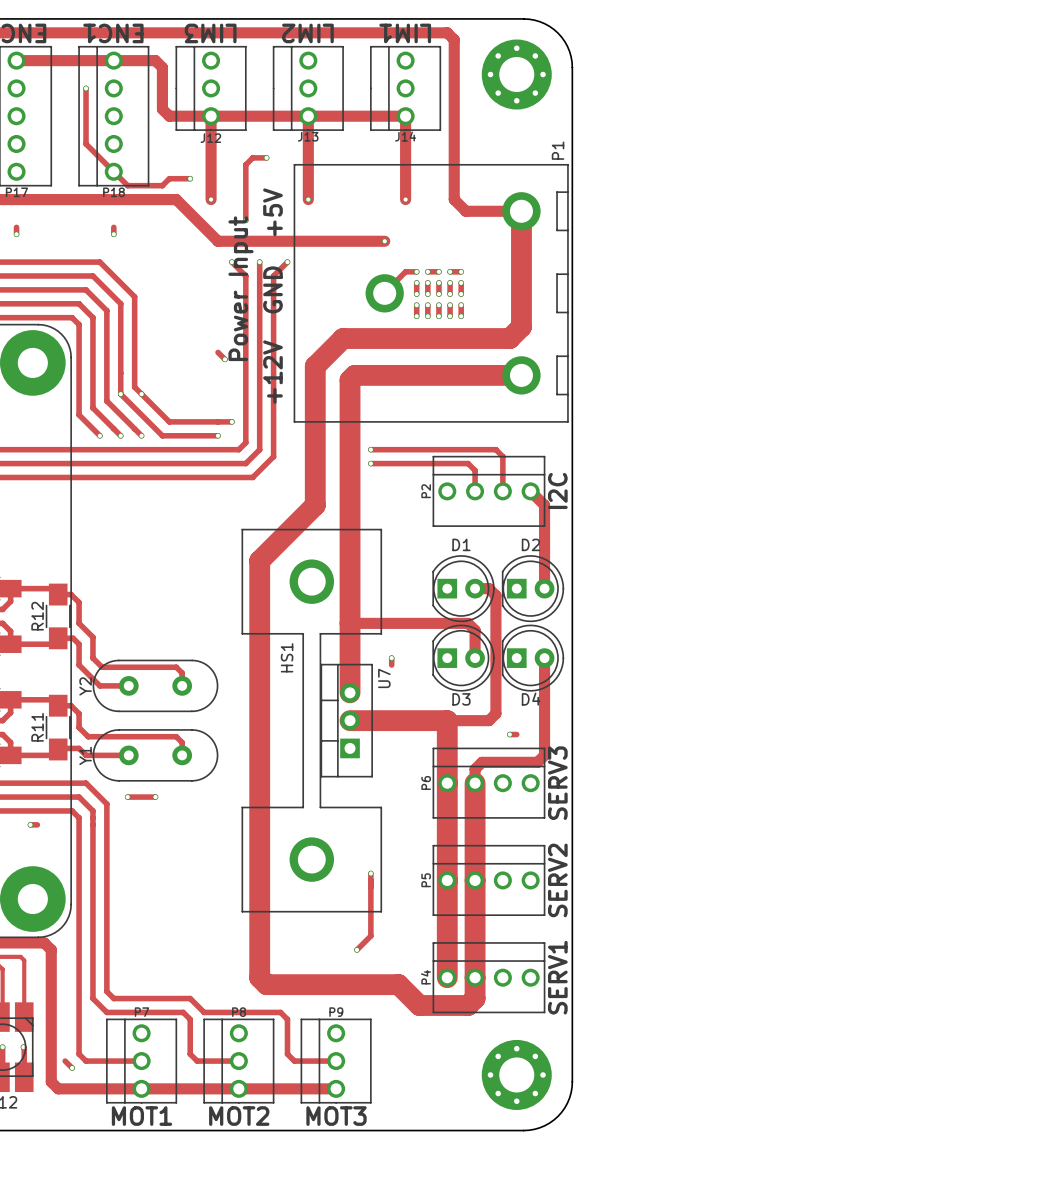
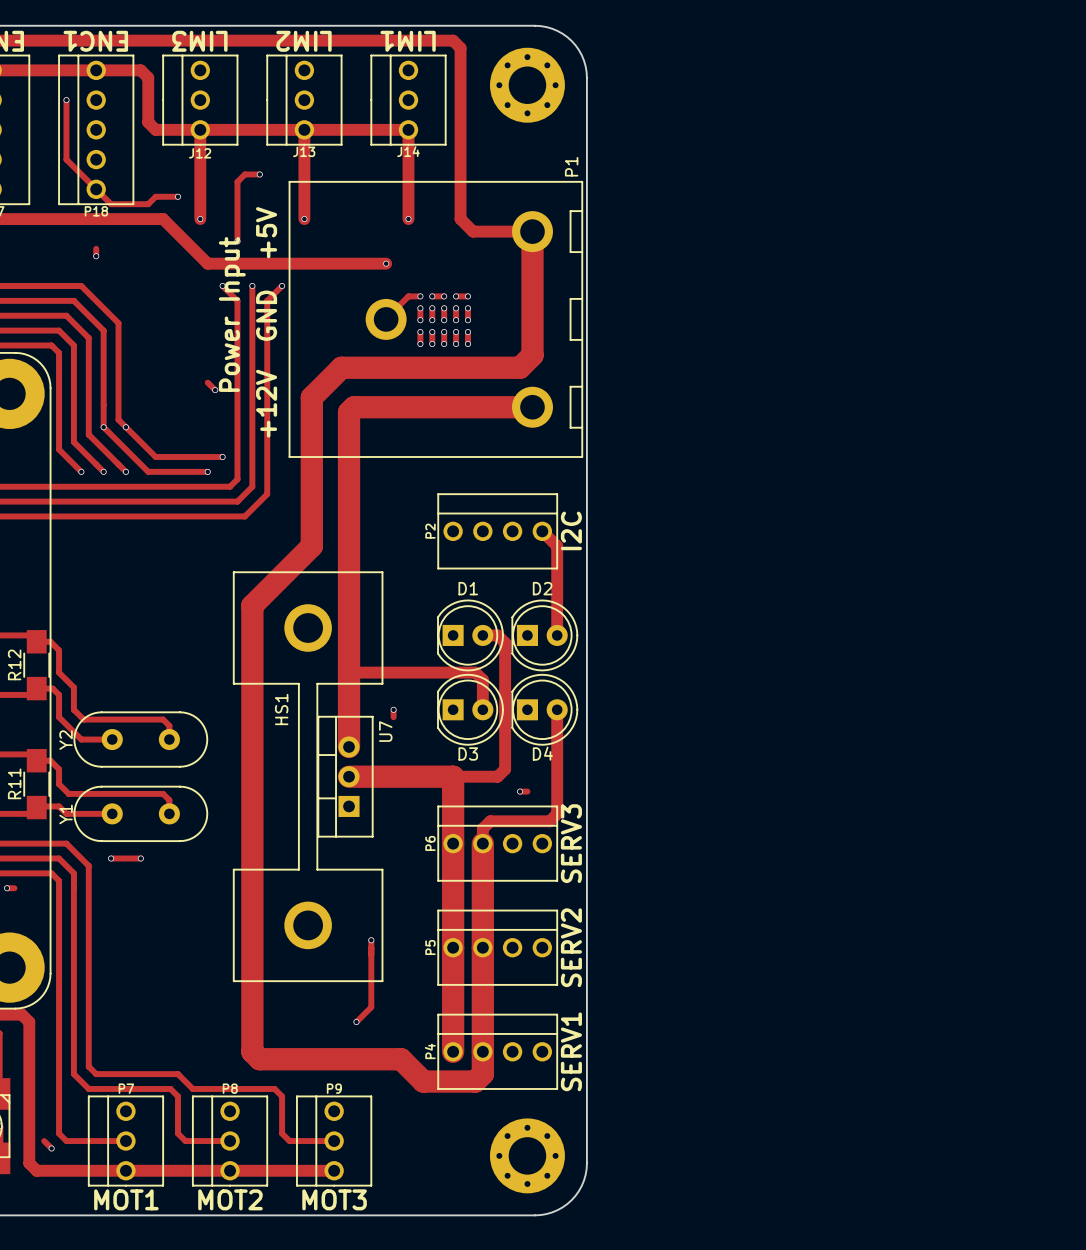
track: (370, 449) (495, 449) (502, 456) (502, 491) -> none
via: (370, 449) -> none
track: (370, 463) (468, 463) (475, 470) (475, 491) -> none
via: (370, 463) -> none

